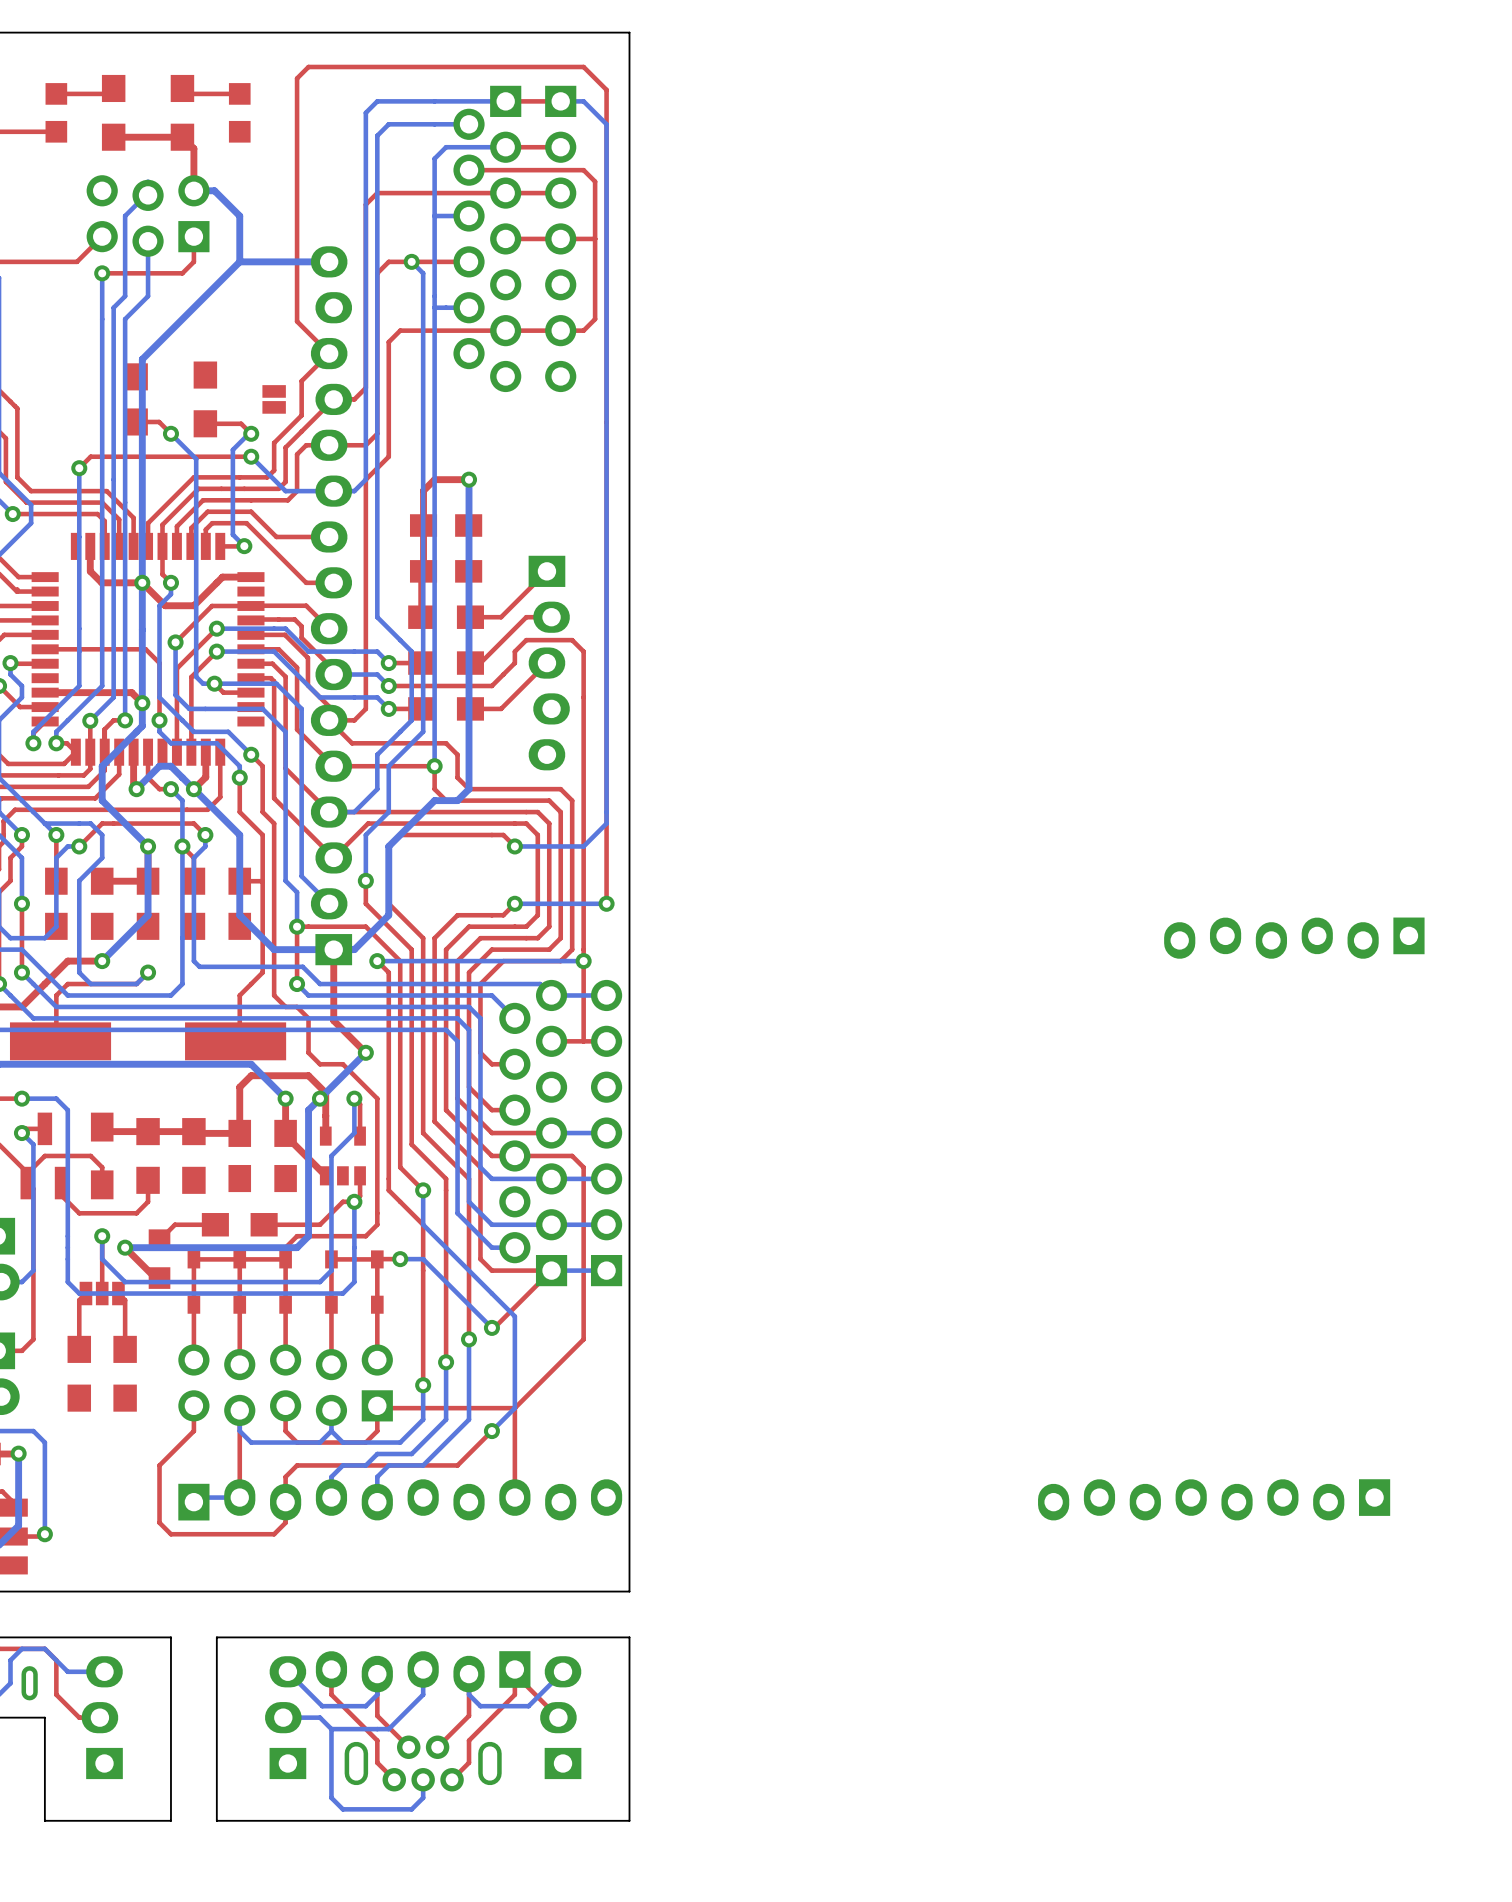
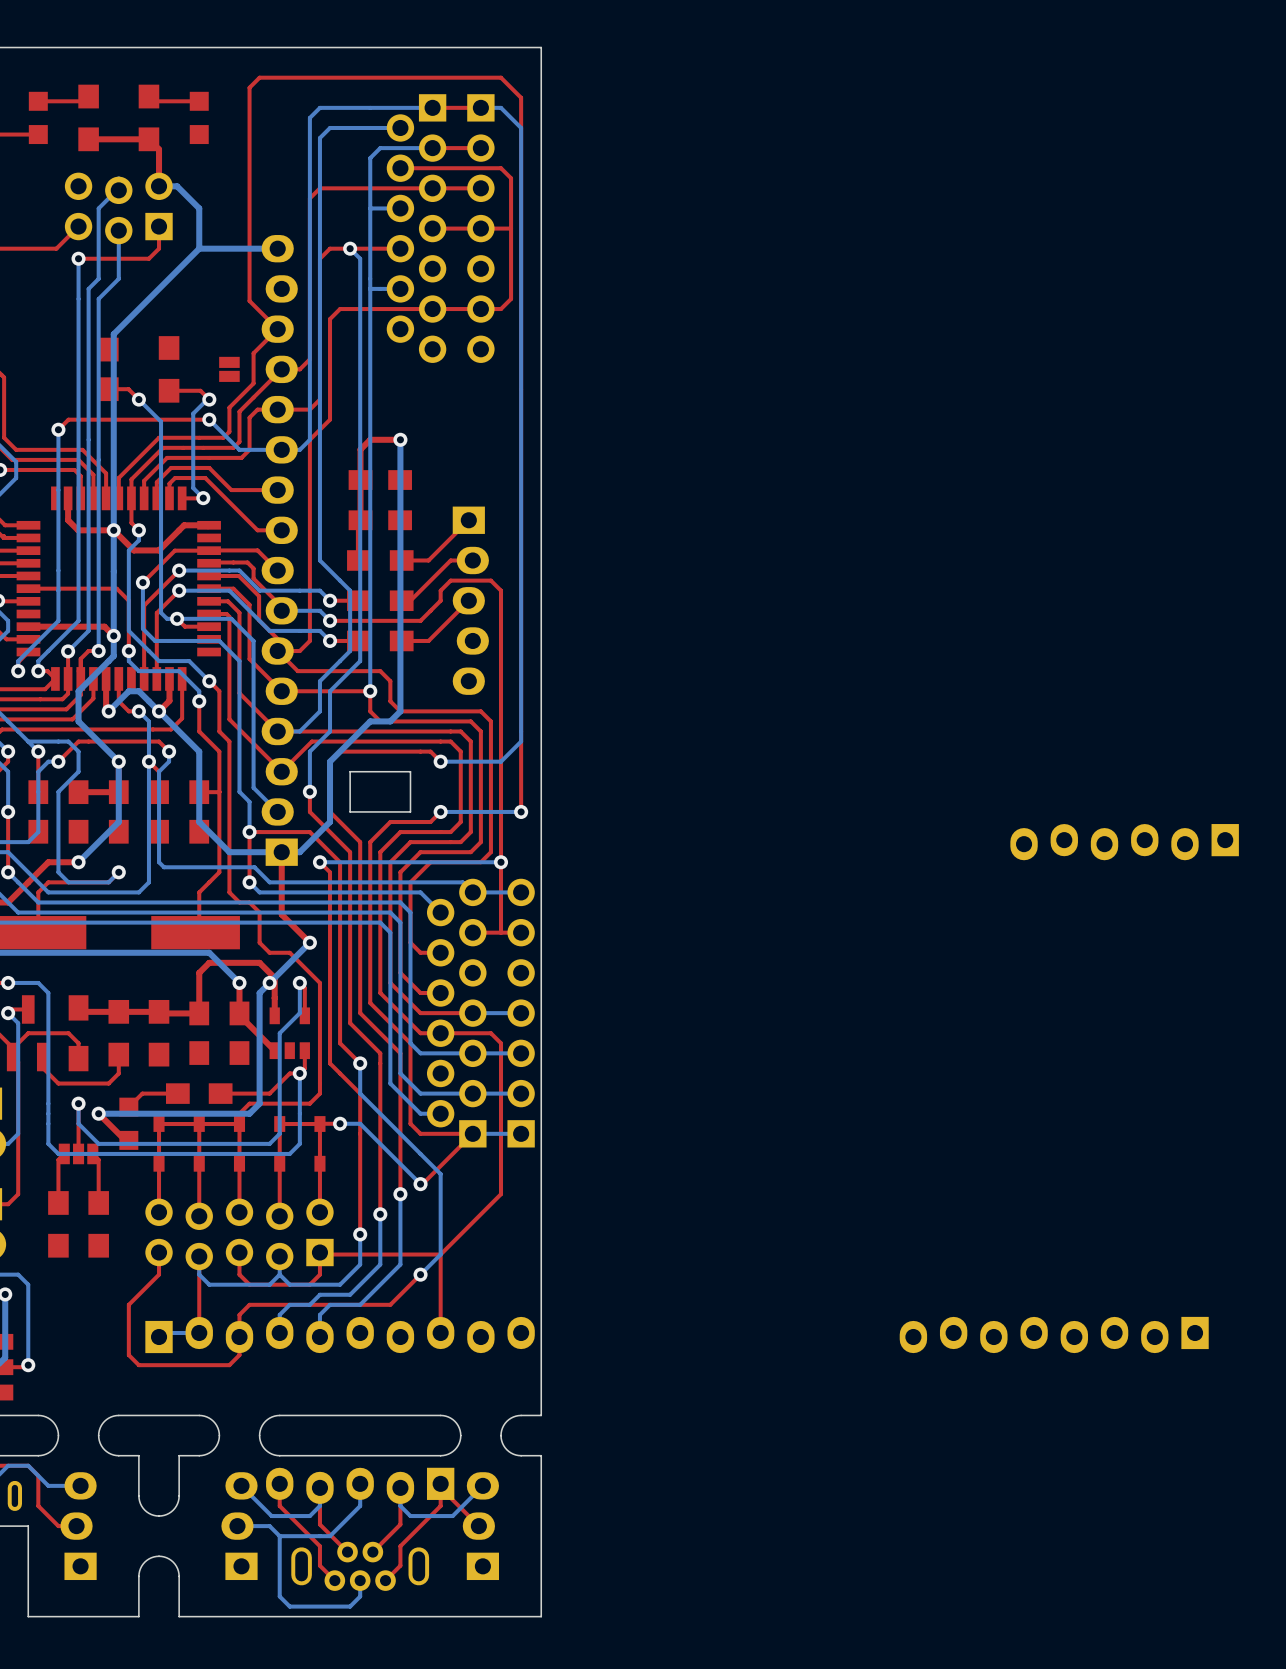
board edge: none -> (410, 771) (410, 811) (350, 811) (350, 771) (410, 771)
board edge: (148, 1591) (56, 1591) -> (118, 1415) (111, 1416) (104, 1421) (100, 1427) (98, 1435) (100, 1443) (104, 1449) (111, 1454) (118, 1455)
board edge: (331, 1591) (239, 1591) -> (279, 1415) (272, 1416) (265, 1421) (261, 1427) (259, 1435) (261, 1443) (265, 1449) (272, 1454) (279, 1455)
board edge: (606, 1591) (514, 1591) -> (521, 1415) (513, 1416) (506, 1421) (502, 1427) (501, 1435) (502, 1443) (506, 1449) (513, 1454) (521, 1455)
board edge: (148, 1637) (56, 1637) -> (38, 1415) (46, 1416) (52, 1421) (56, 1427) (58, 1435) (56, 1443) (52, 1449) (46, 1454) (38, 1455)
board edge: (331, 1637) (239, 1637) -> (199, 1415) (206, 1416) (213, 1421) (217, 1427) (219, 1435) (217, 1443) (213, 1449) (206, 1454) (199, 1455)
board edge: (606, 1637) (514, 1637) -> (440, 1415) (448, 1416) (454, 1421) (459, 1427) (460, 1435) (459, 1443) (454, 1449) (448, 1454) (440, 1455)
board edge: (170, 1683) (170, 1774) -> (138, 1495) (140, 1503) (144, 1510) (151, 1514) (159, 1516) (166, 1514) (173, 1510) (177, 1503) (179, 1495)
board edge: (216, 1683) (216, 1774) -> (138, 1576) (140, 1568) (144, 1562) (151, 1557) (159, 1556) (166, 1557) (173, 1562) (177, 1568) (179, 1576)

